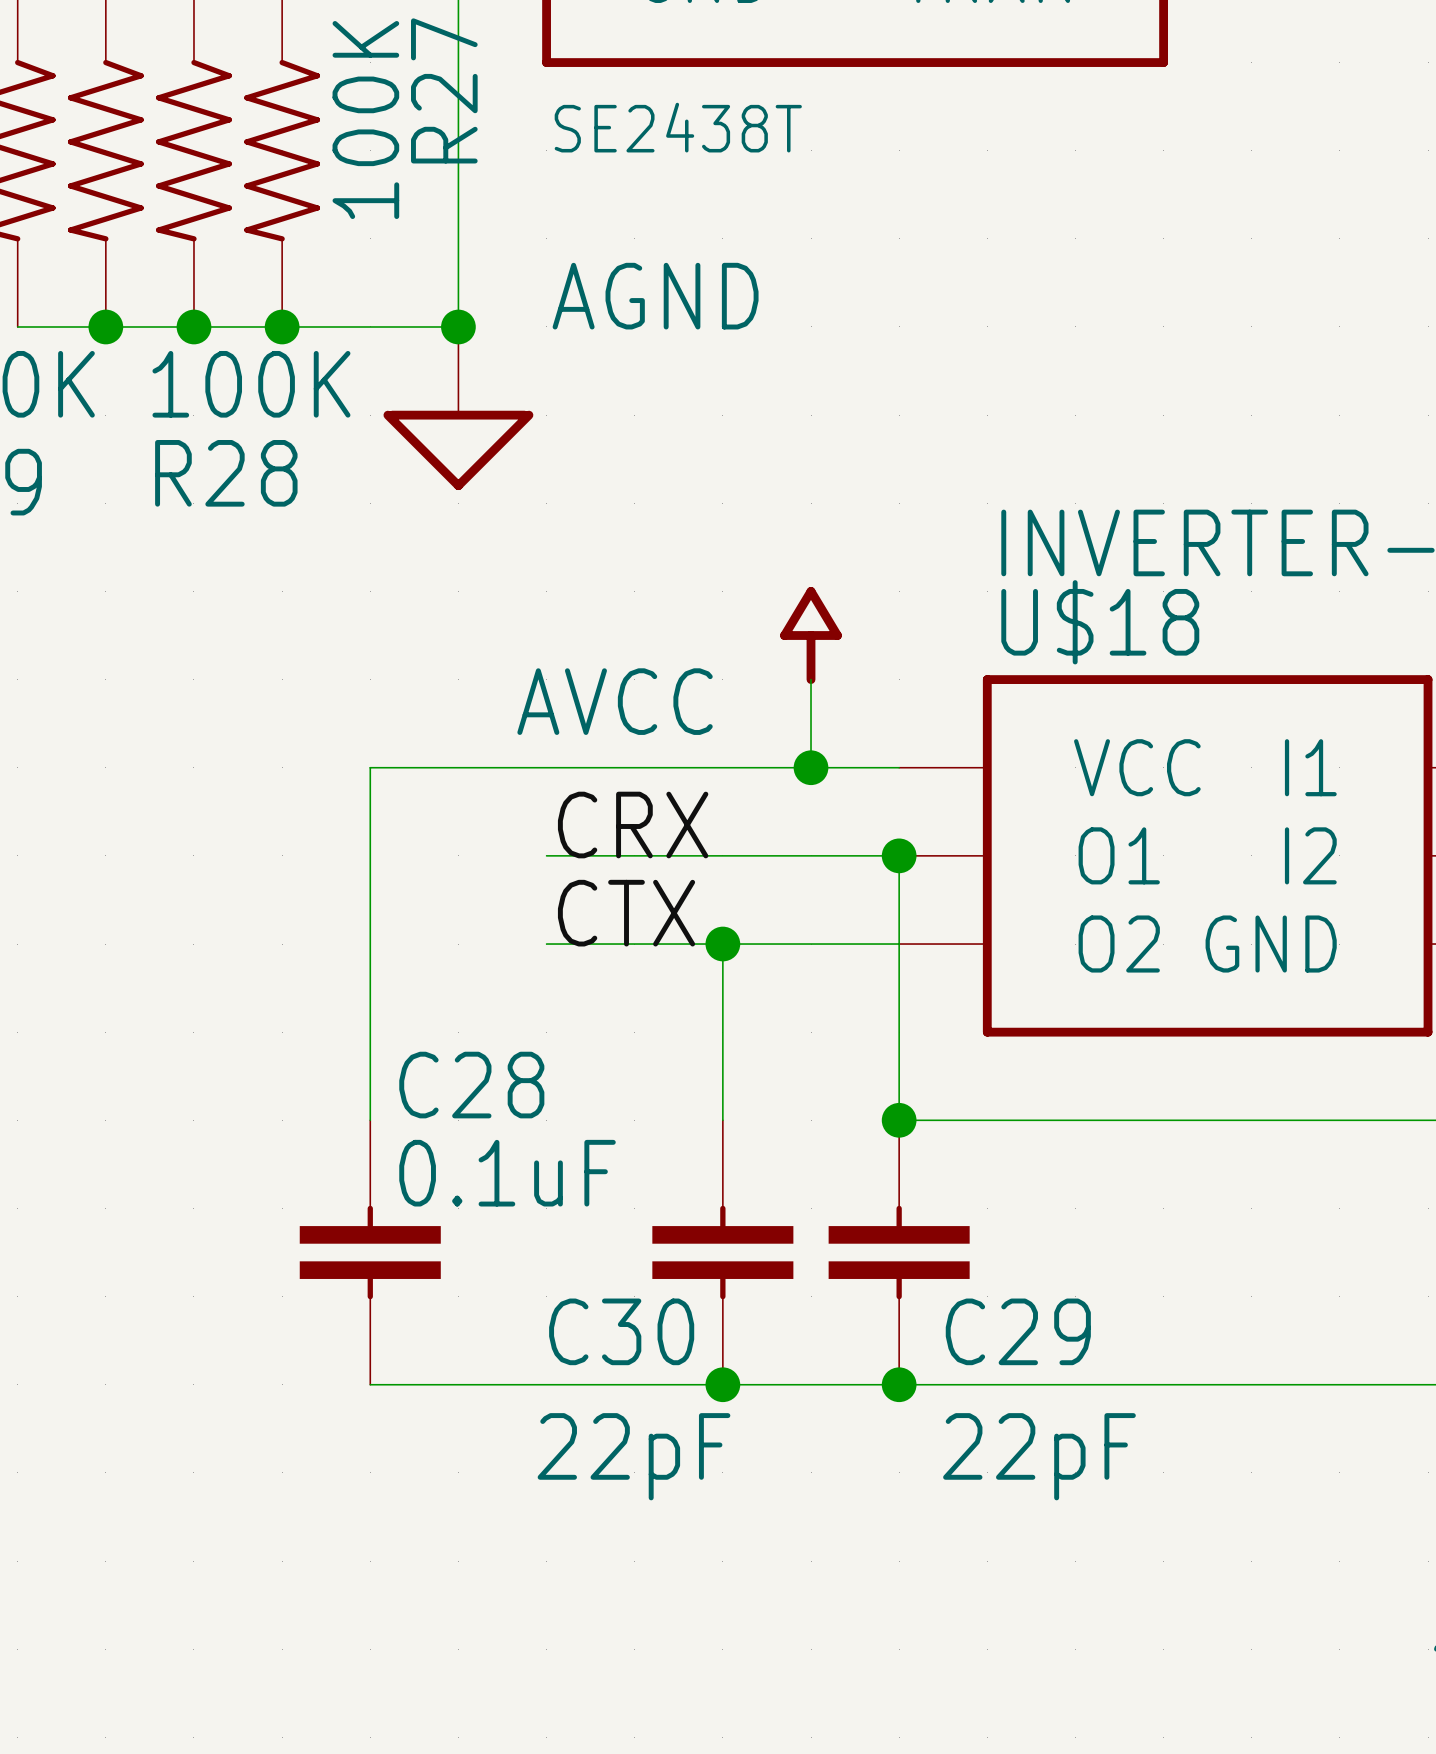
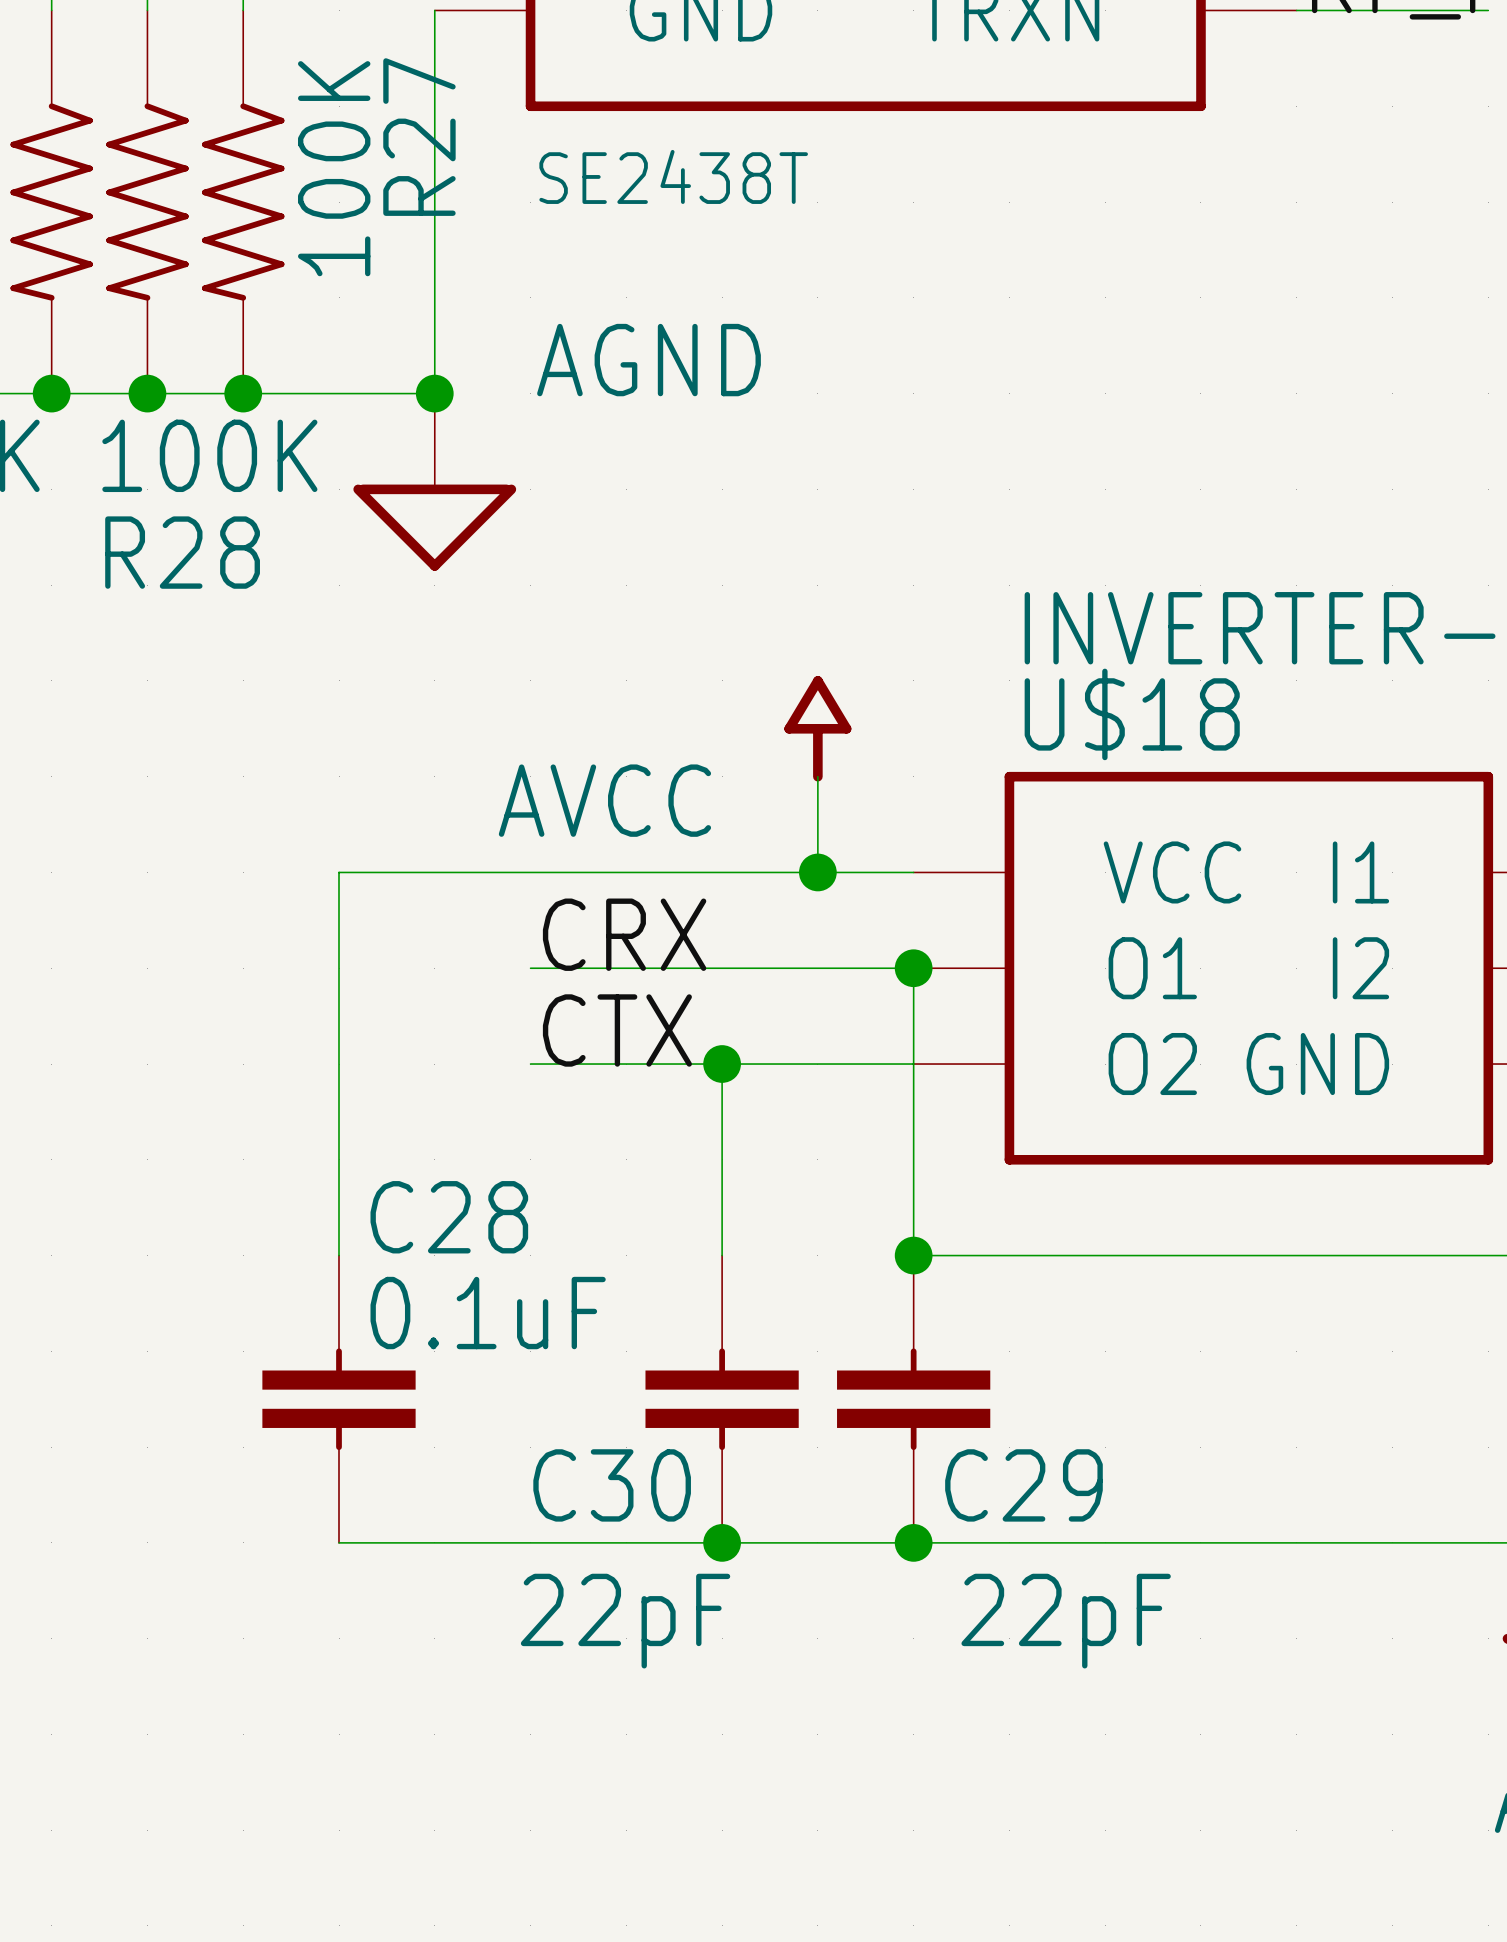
C29 name position: C29 (1018, 1331) -> C29 (1023, 1485)

